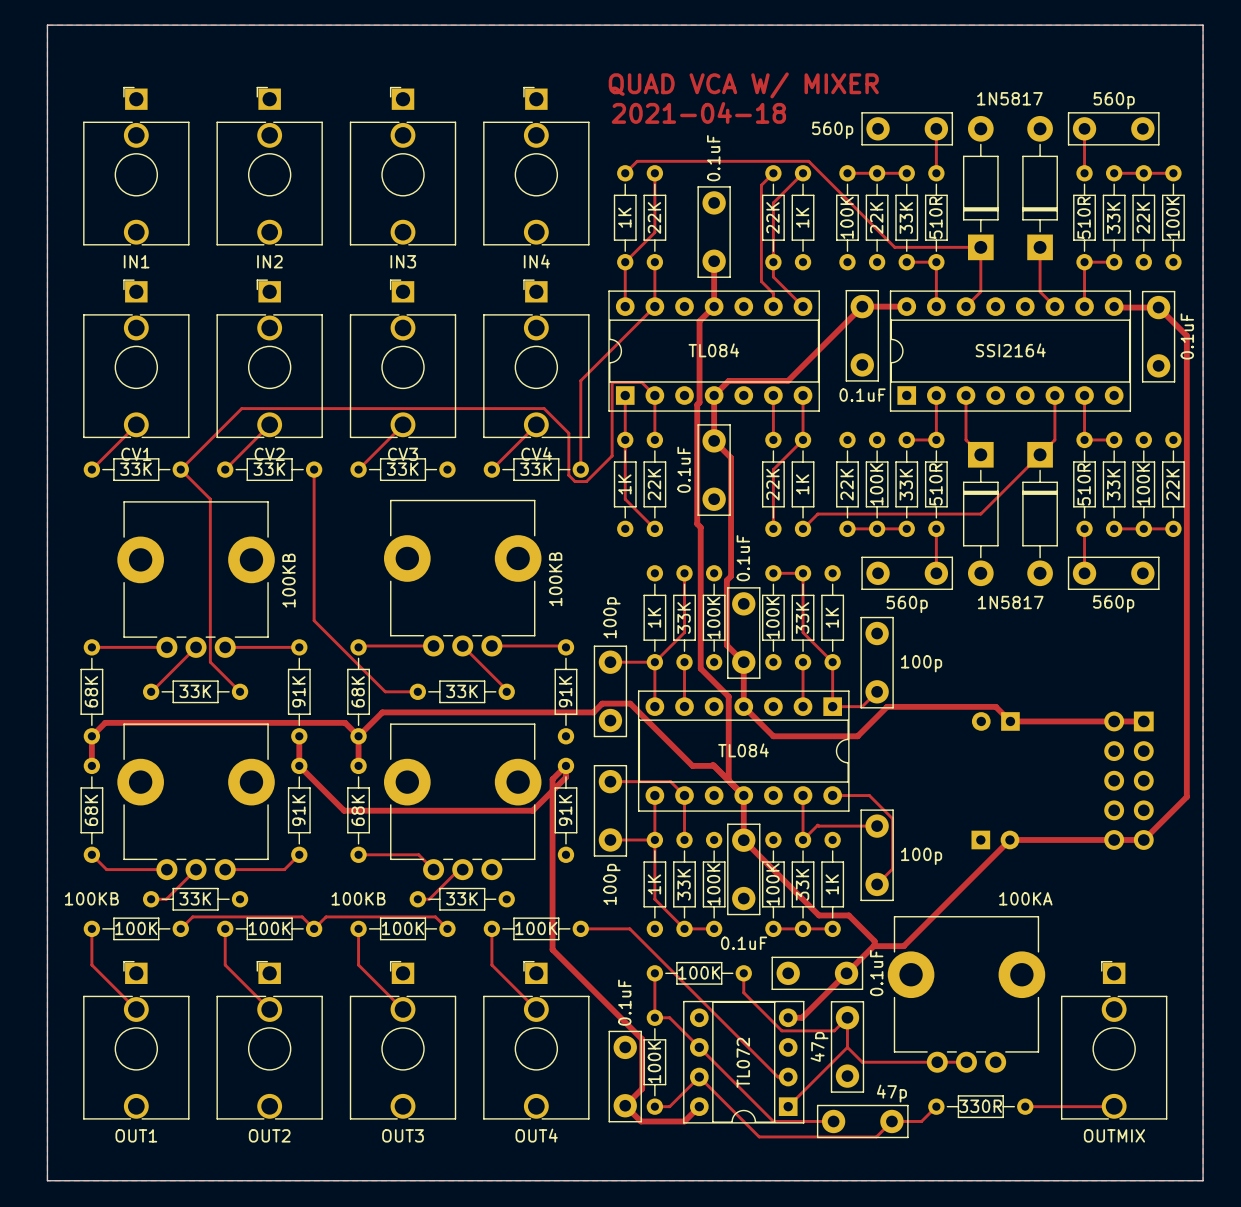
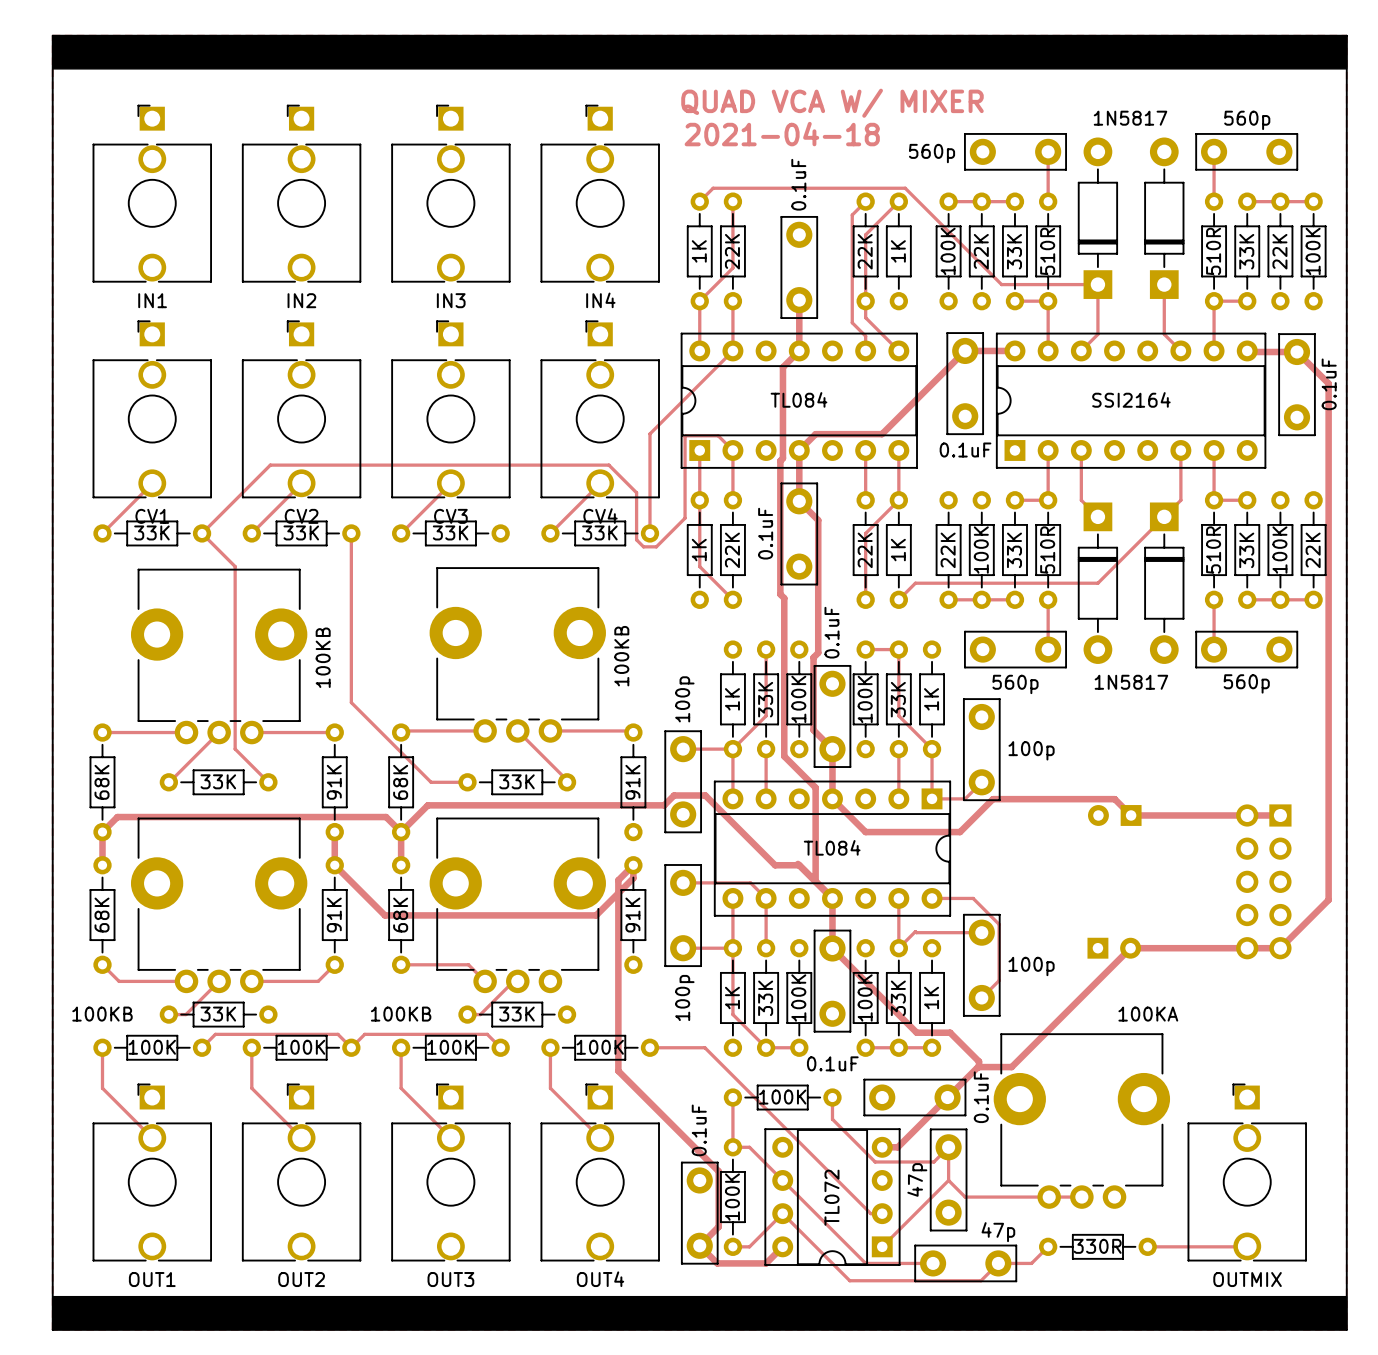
drawing: none -> [52, 35, 1348, 70]
drawing: none -> [52, 1295, 1348, 1331]

